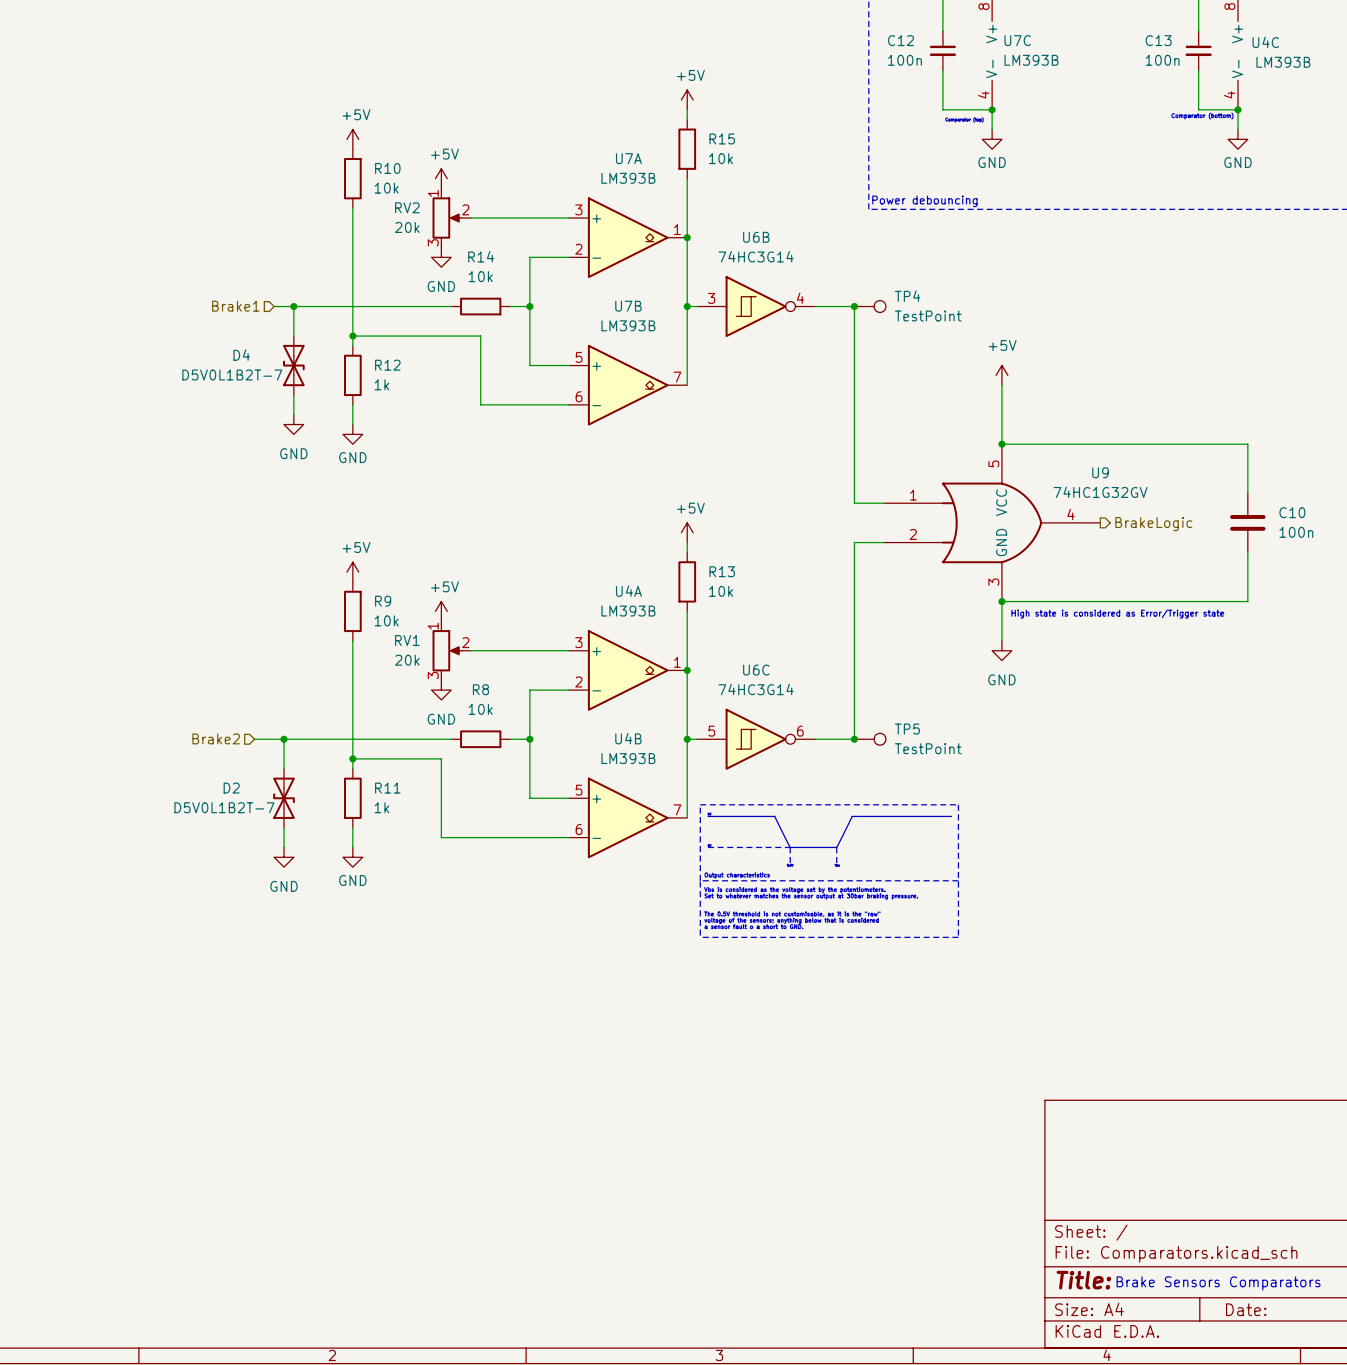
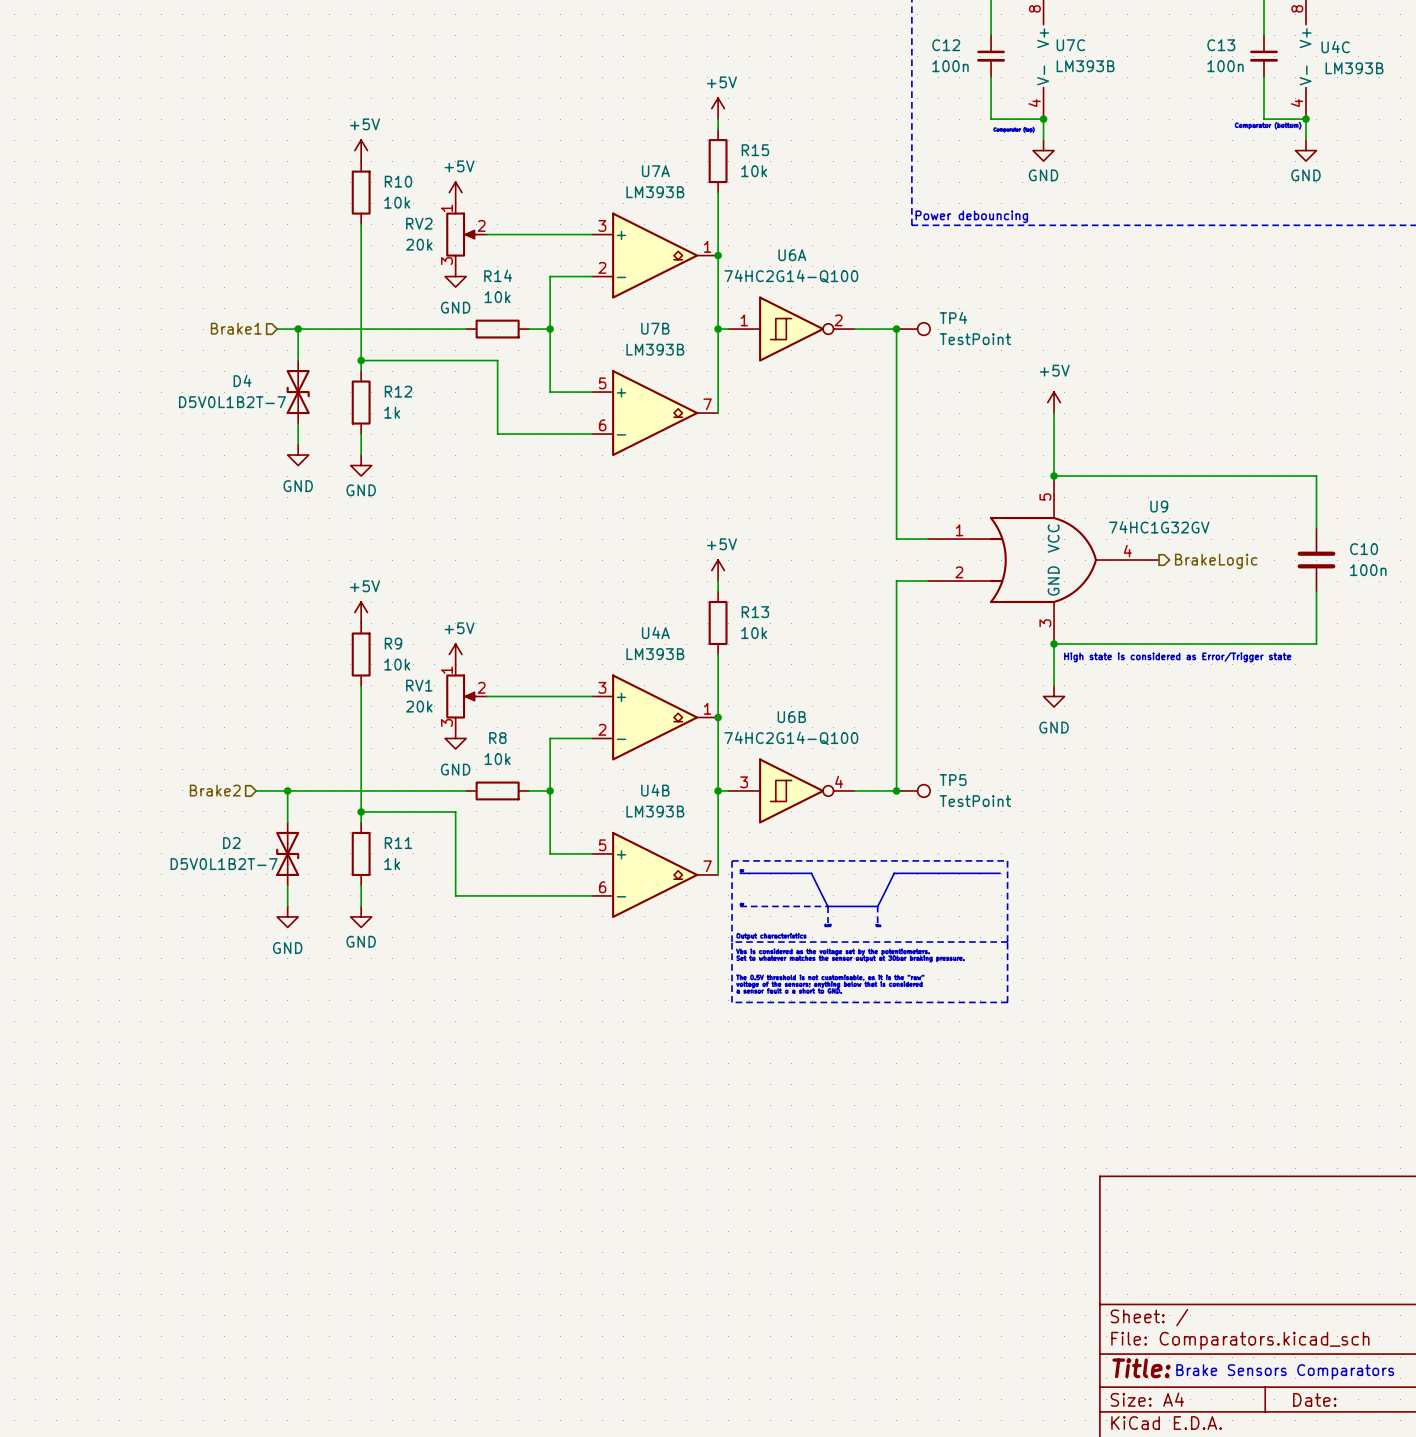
U6B value: 74HC3G14 (756, 256) -> 74HC2G14-Q100 (791, 738)
U6B position: (756, 306) -> (791, 790)
U6A: none -> 74HC2G14-Q100 (791, 329)
U6C: 74HC3G14 (756, 739) -> none

